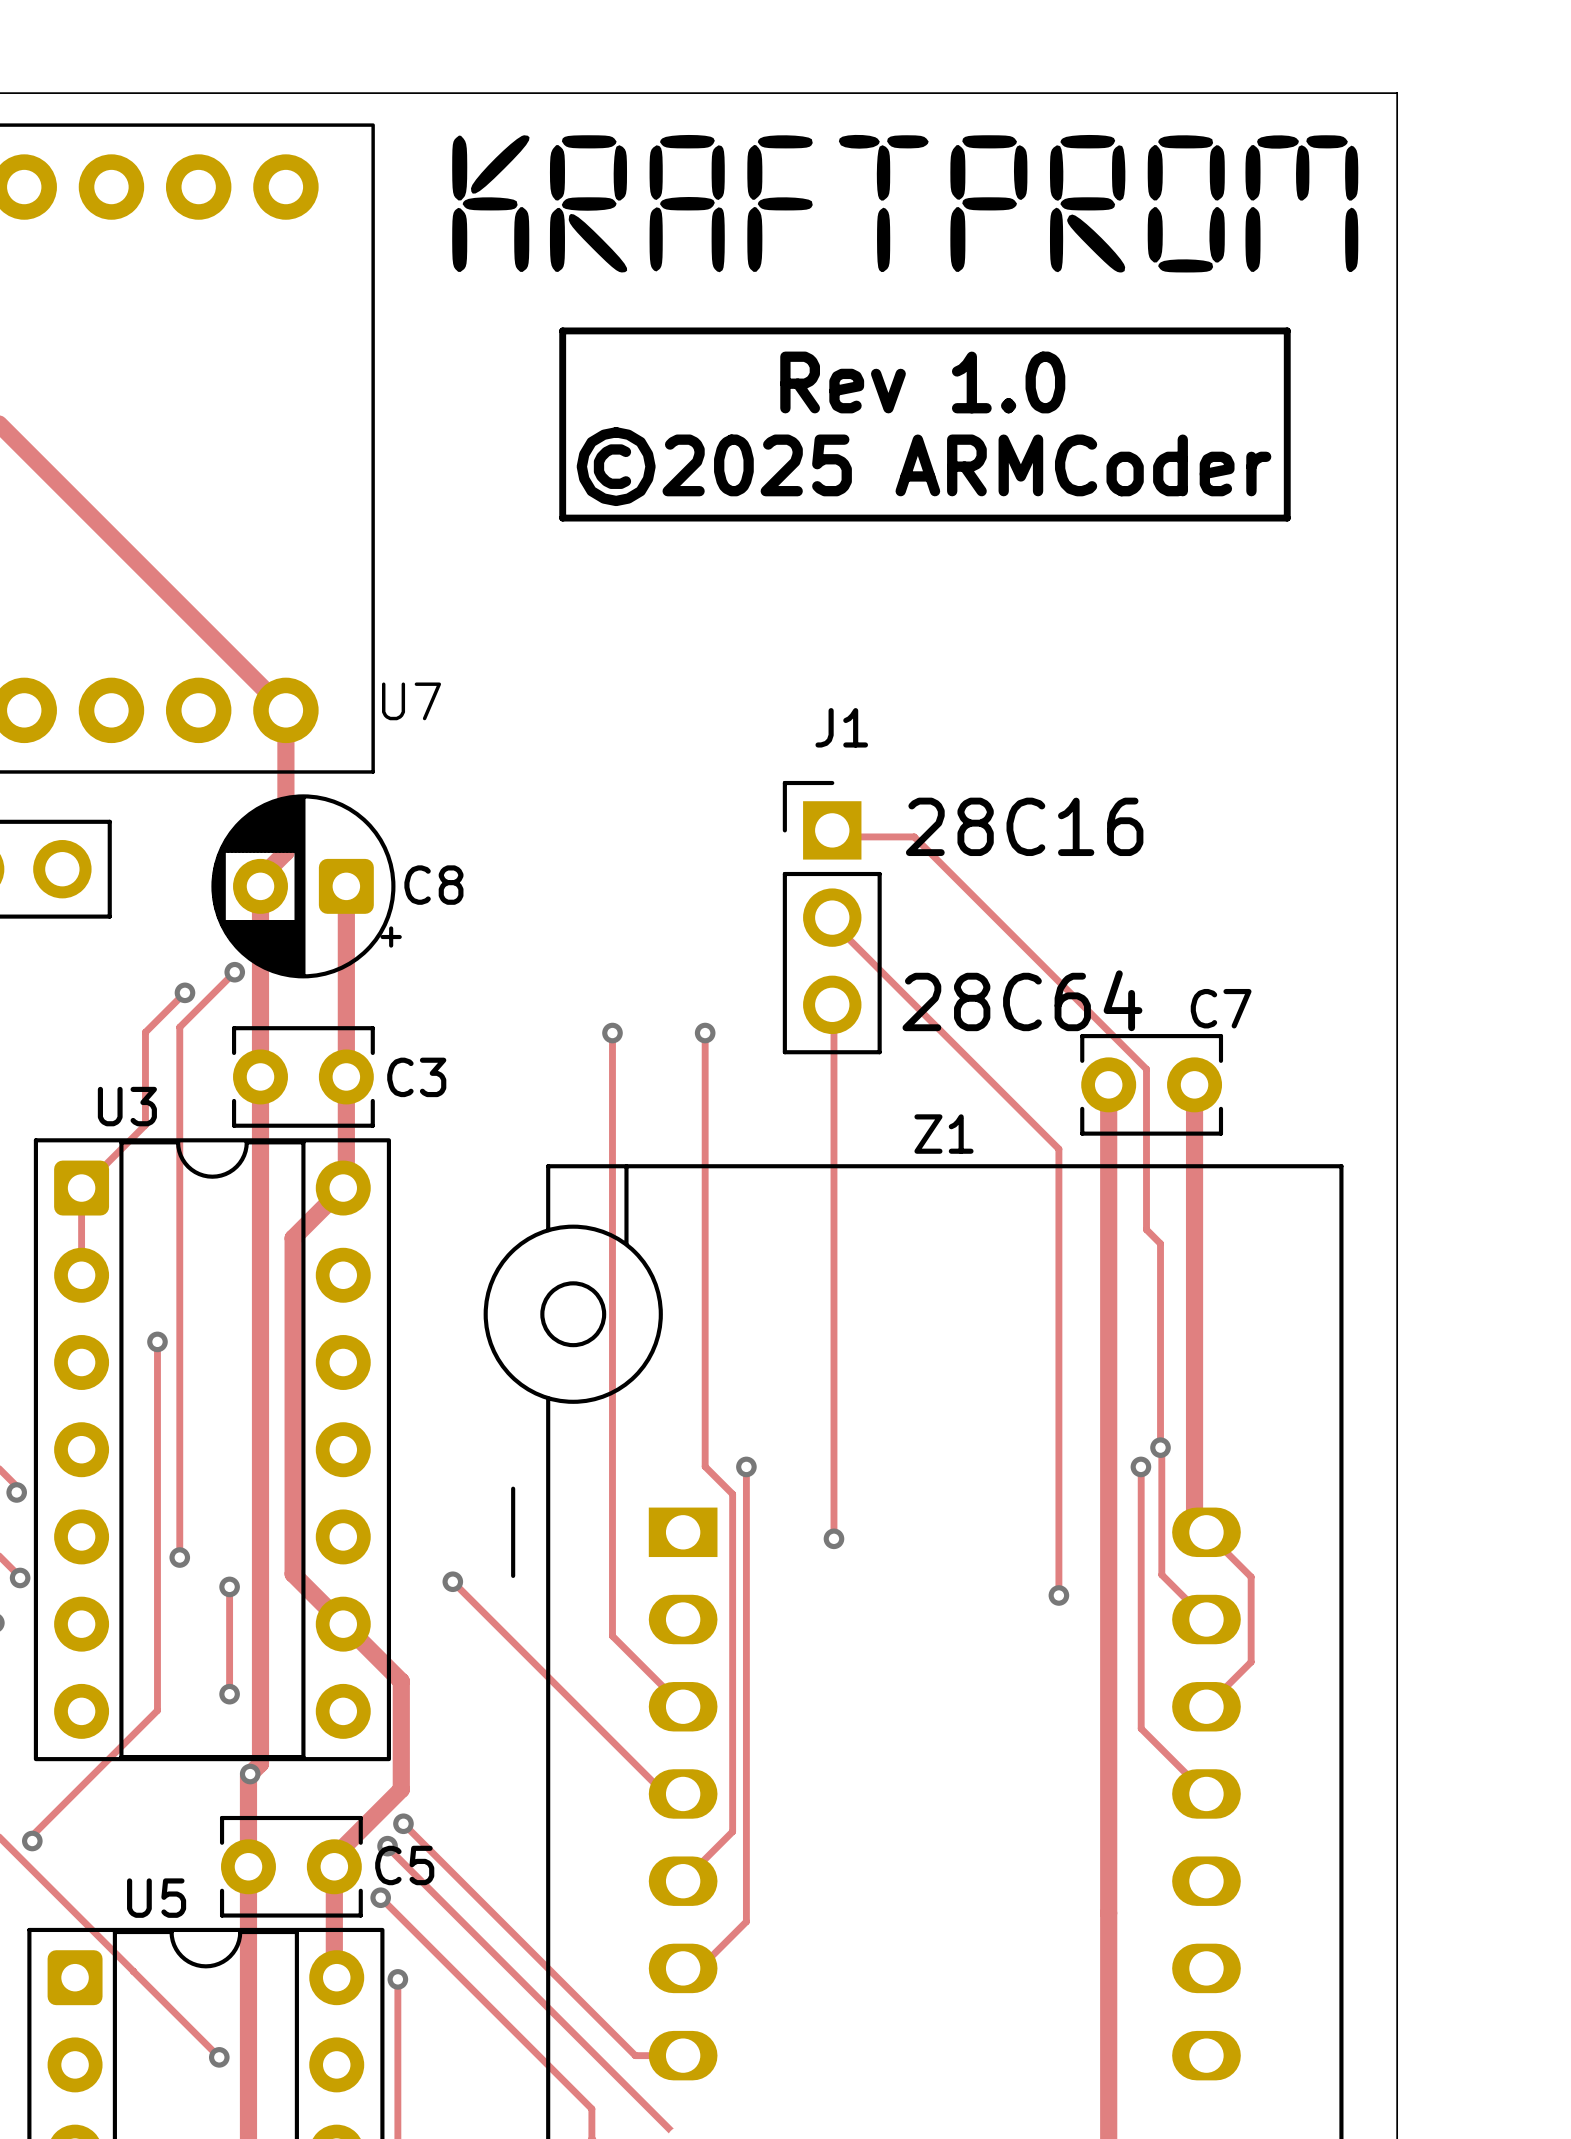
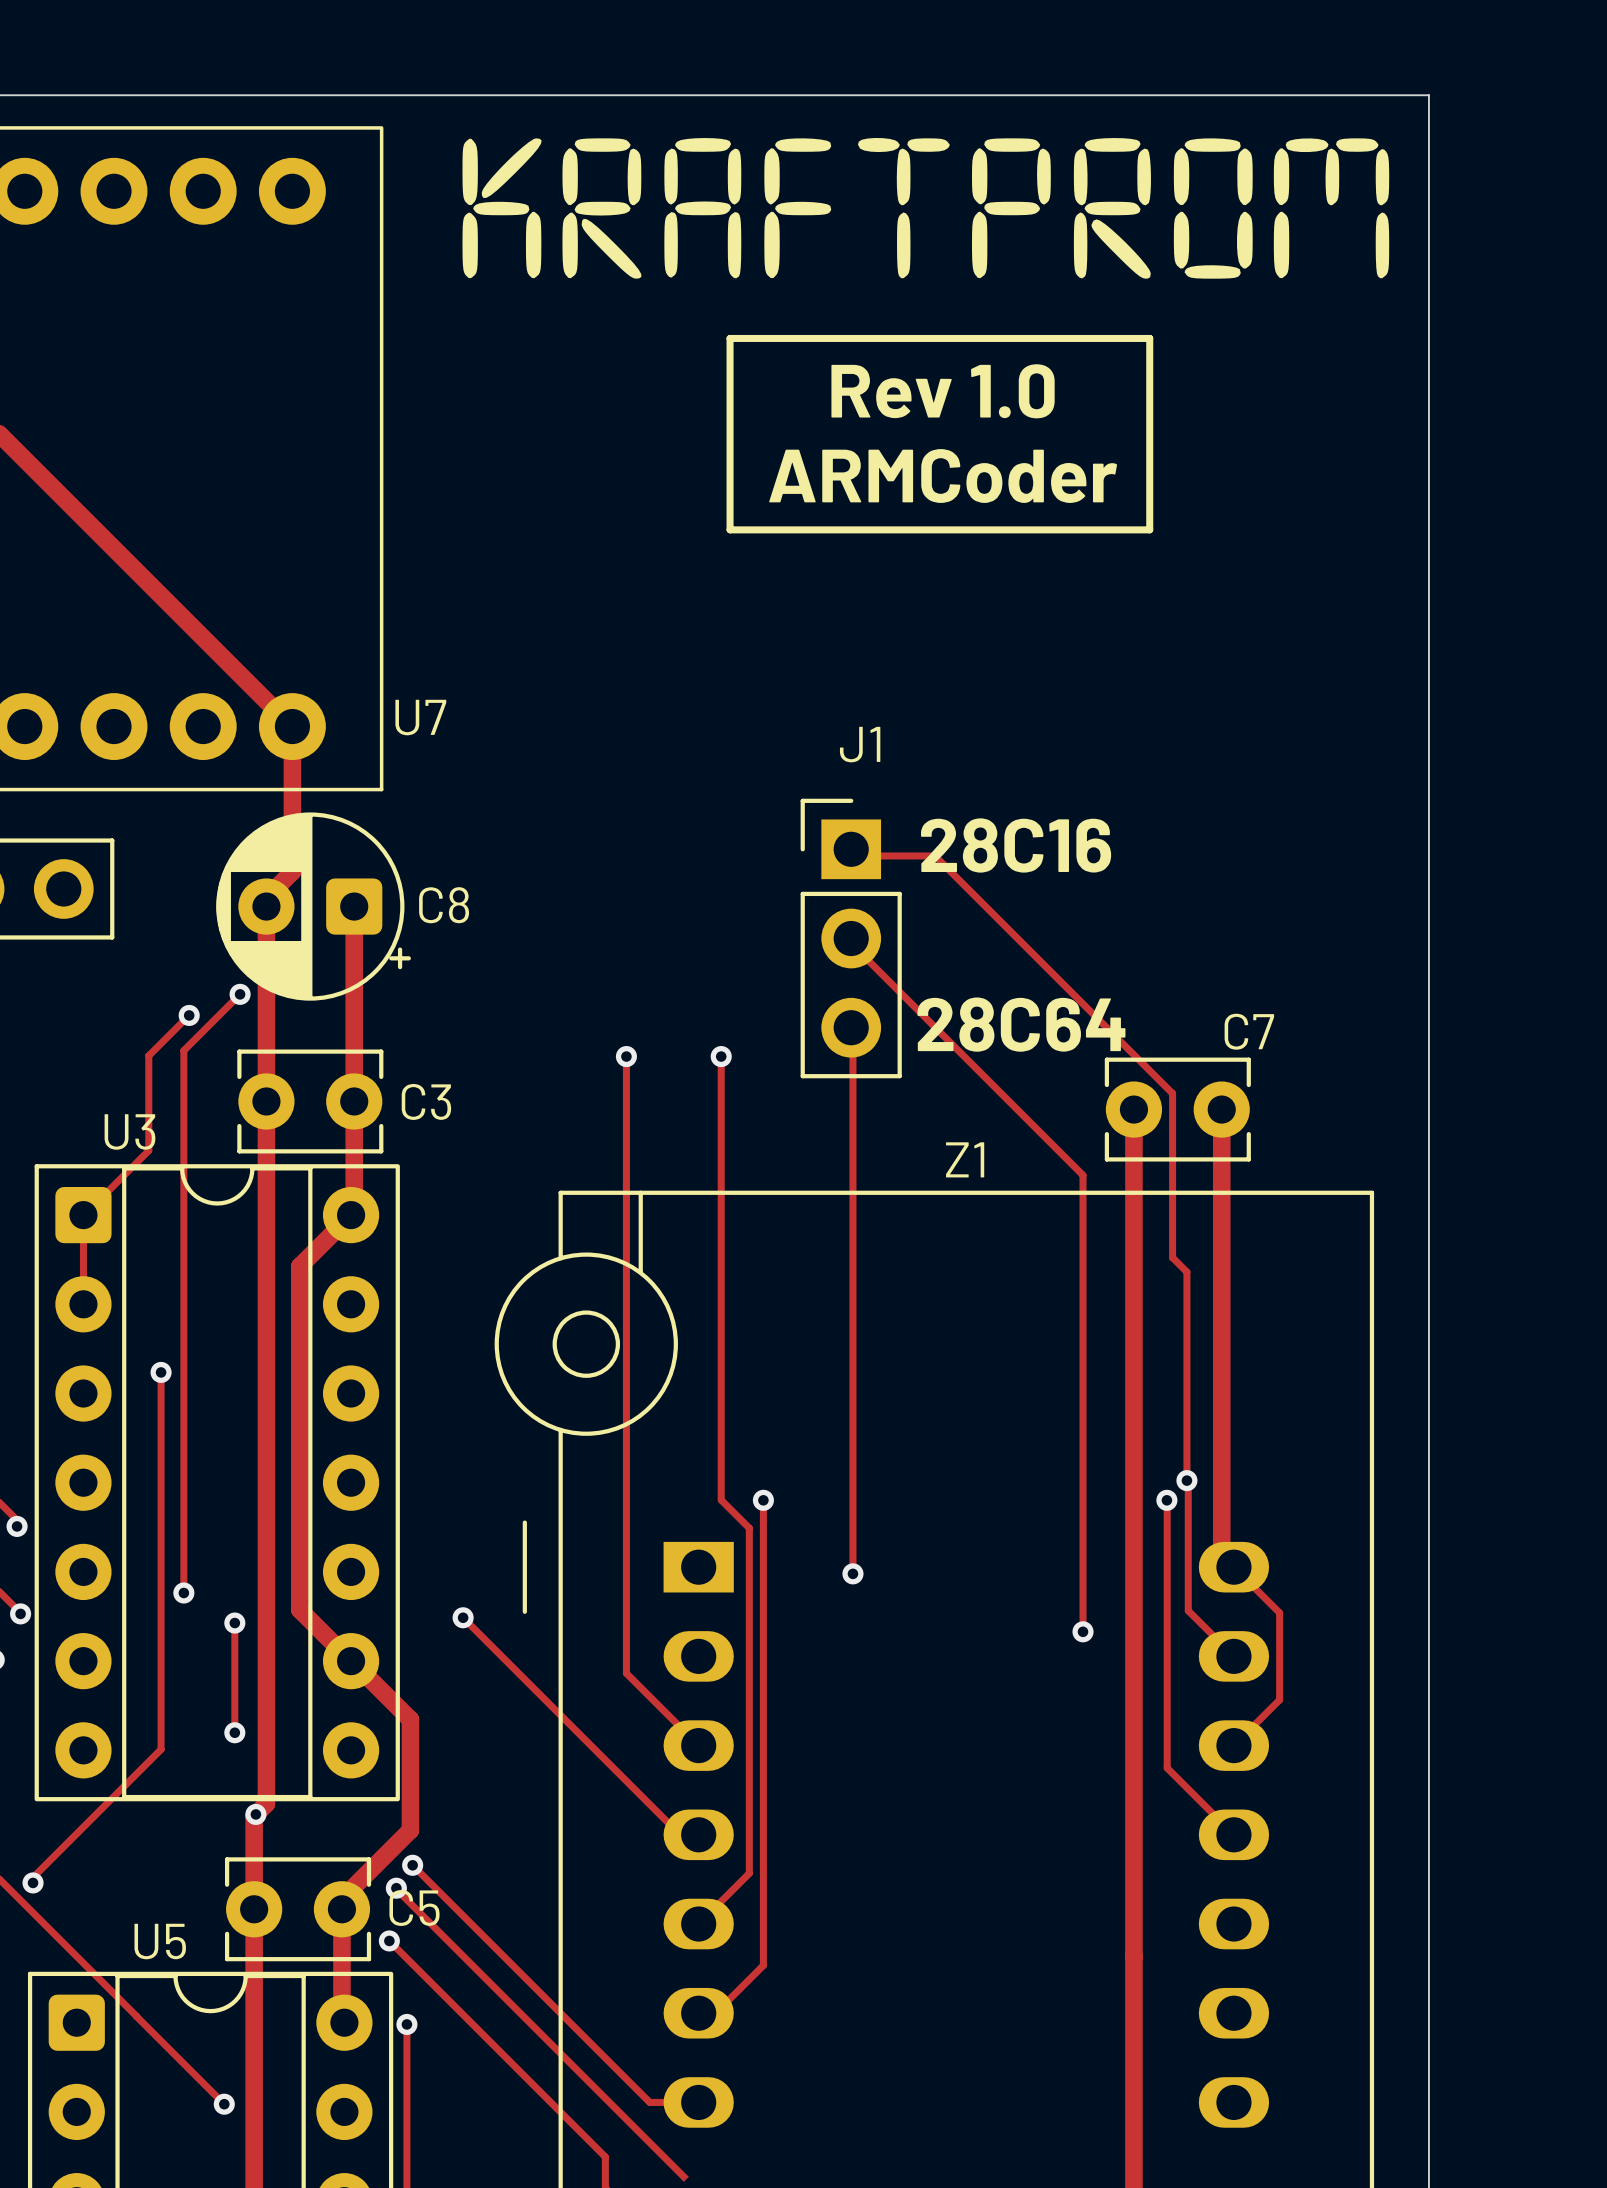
line: (713, 330) (562, 330) (562, 518) (713, 518) -> (730, 338) (730, 529)
line: (1124, 330) (1287, 330) (1287, 518) (1124, 518) -> (1149, 338) (1149, 529)
text: ©2025 ARMCoder (923, 466) -> ARMCoder (943, 476)

